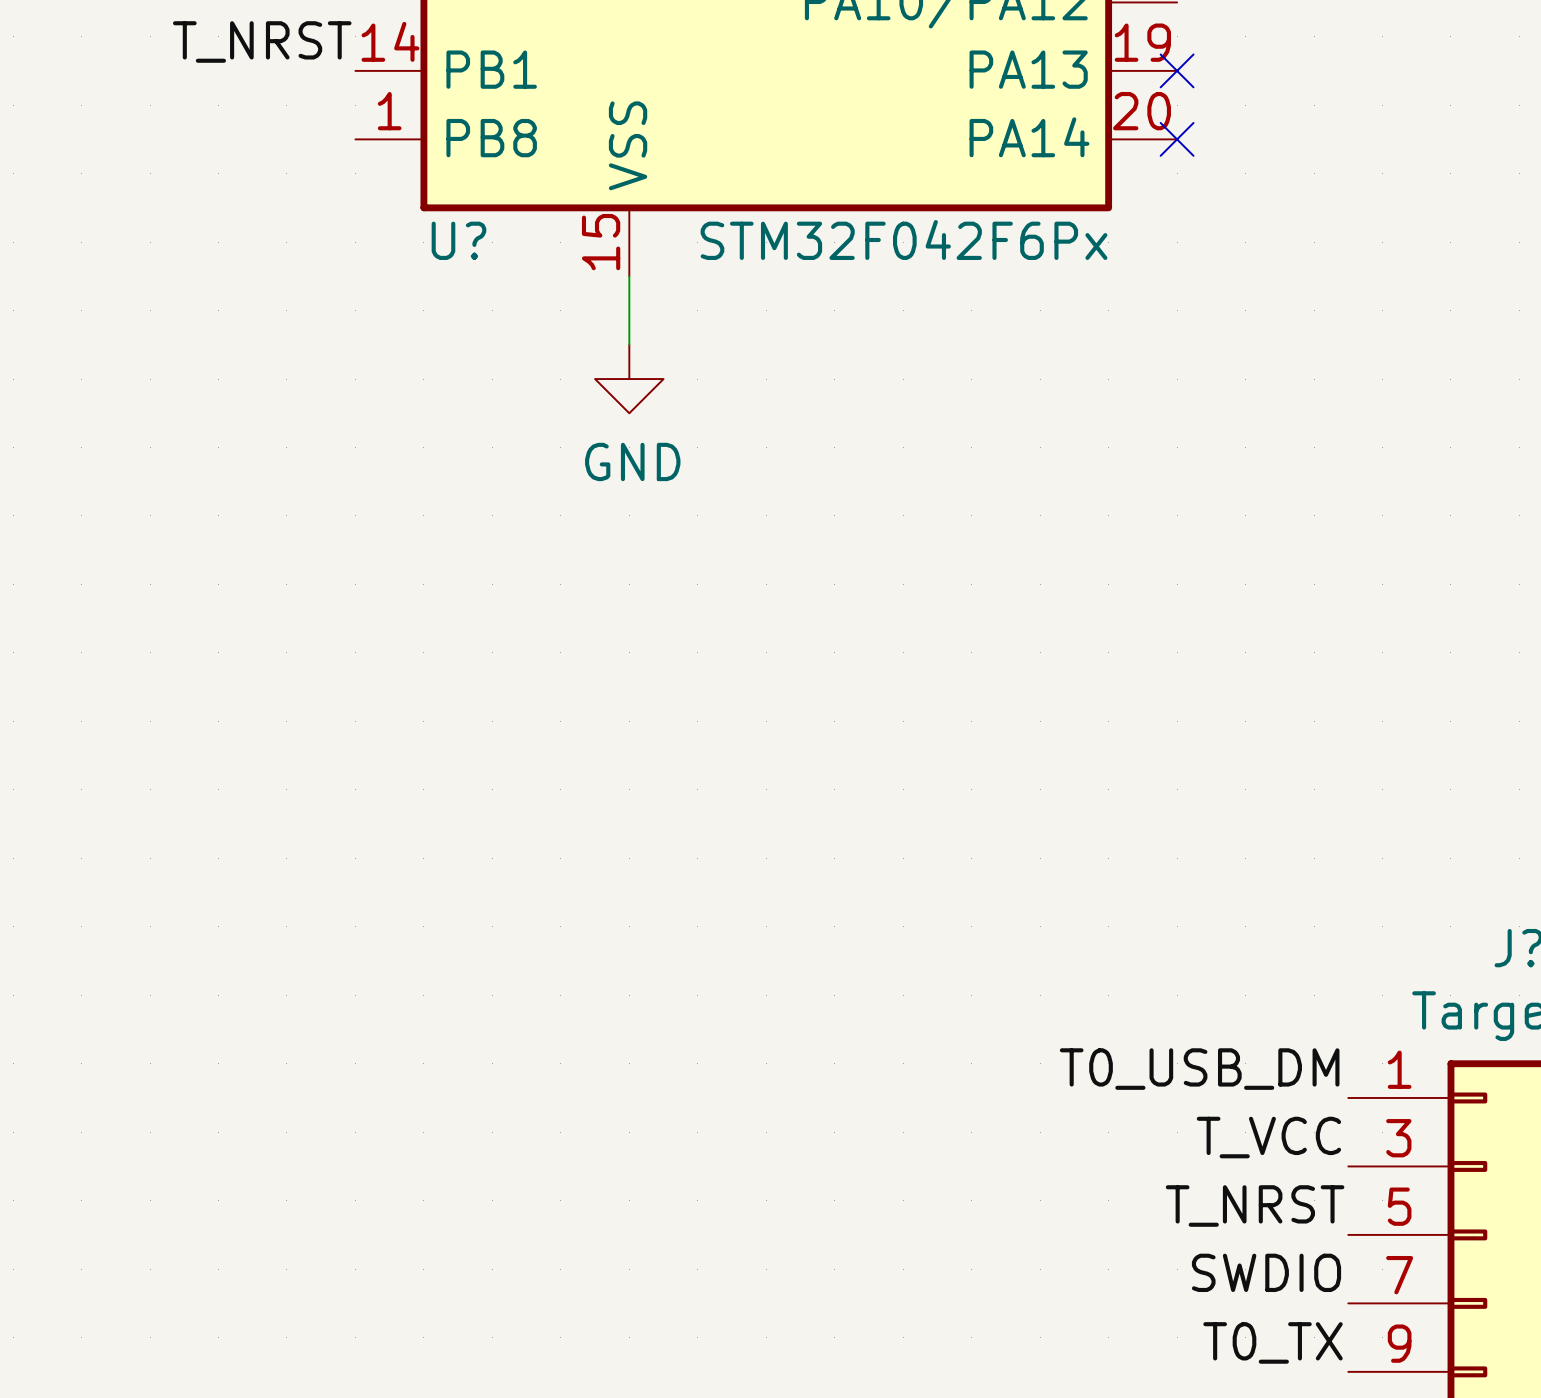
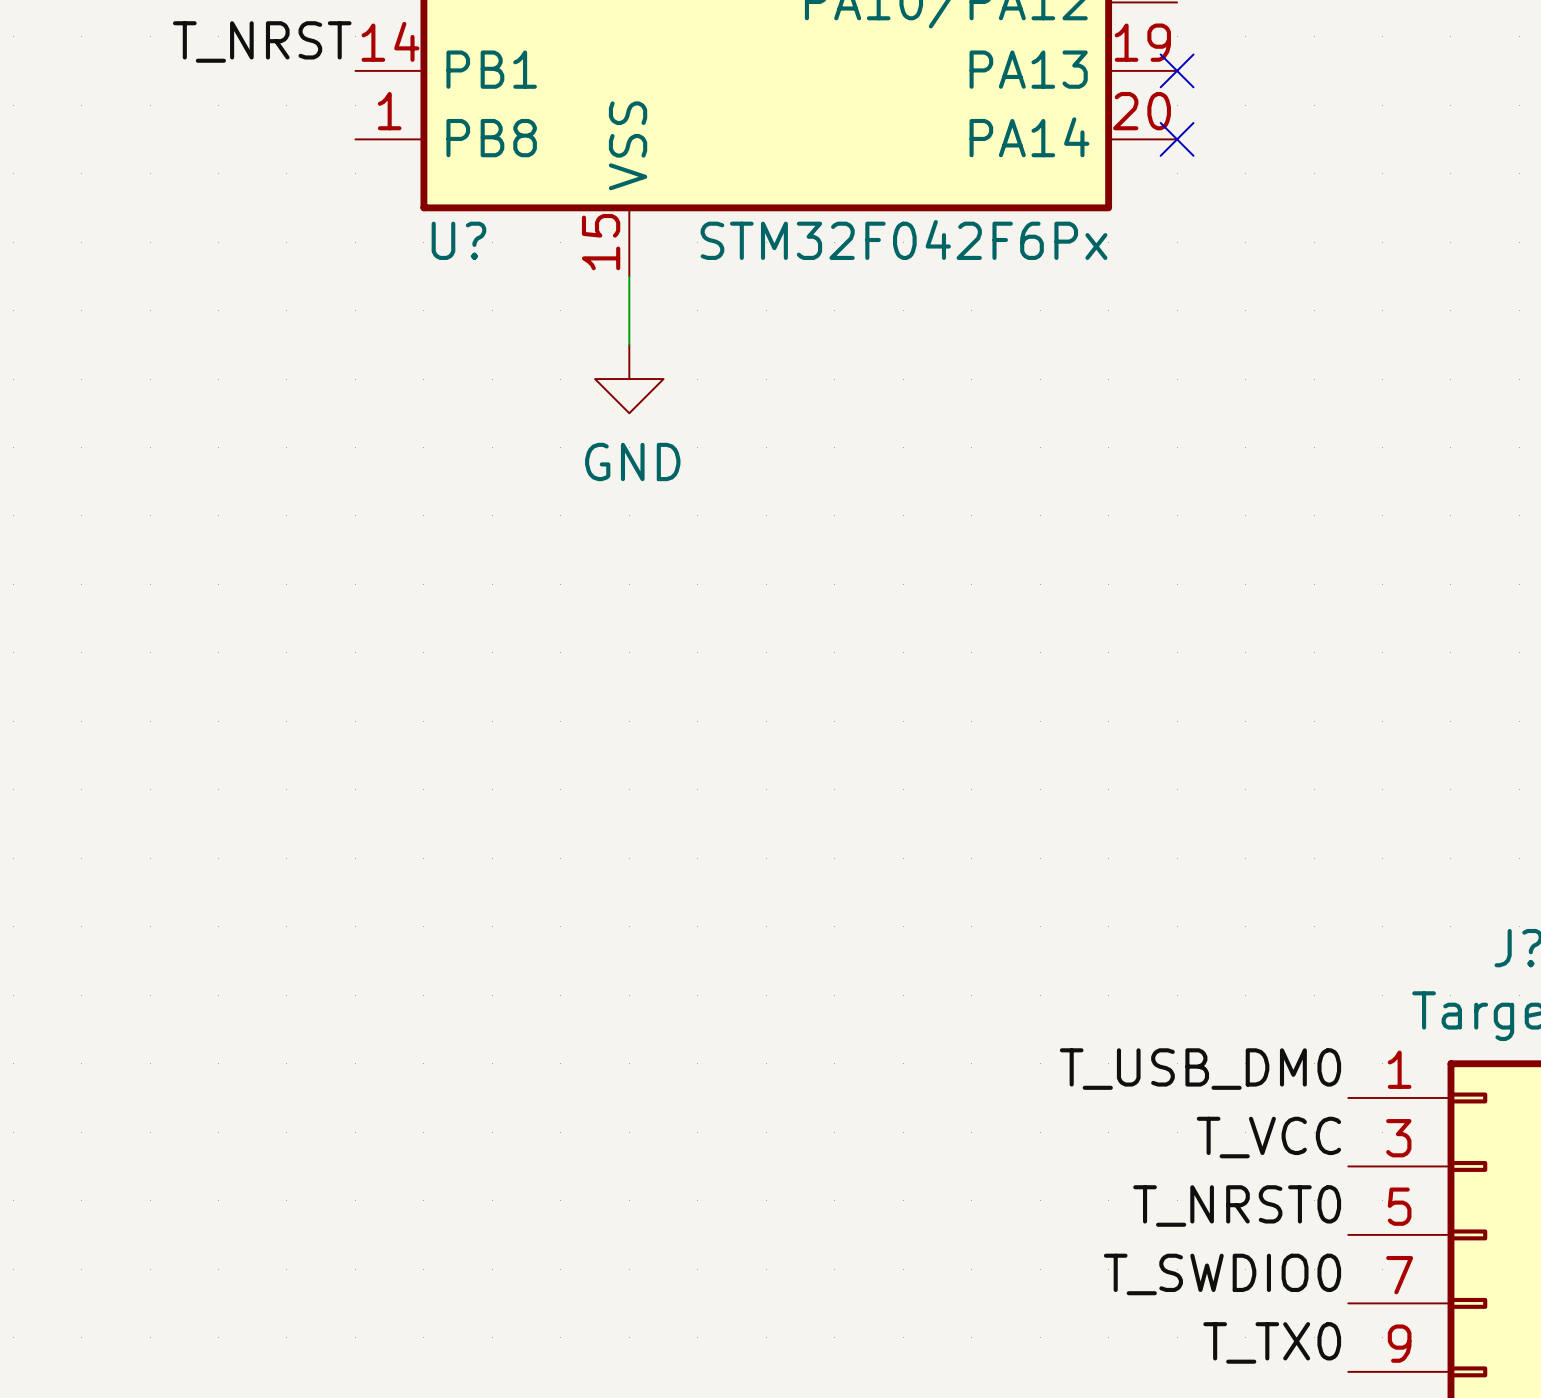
label: T0_USB_DM (1199, 1069) -> T_USB_DM0 (1200, 1069)
label: T_NRST (1255, 1206) -> T_NRST0 (1237, 1206)
label: SWDIO (1266, 1272) -> T_SWDIO0 (1222, 1274)
label: T0_TX (1273, 1342) -> T_TX0 (1272, 1342)

